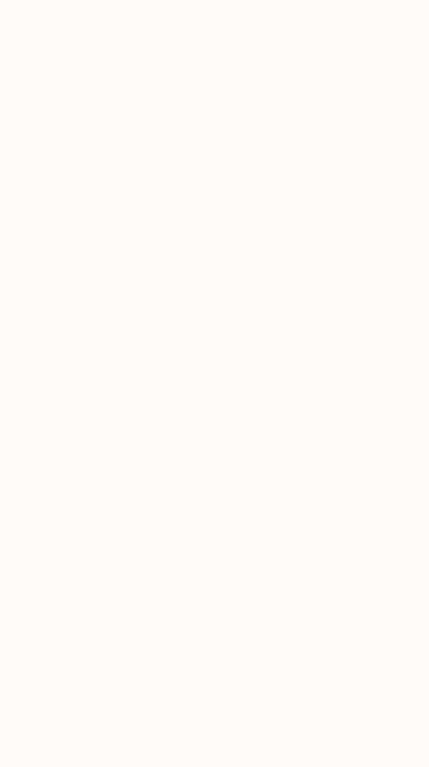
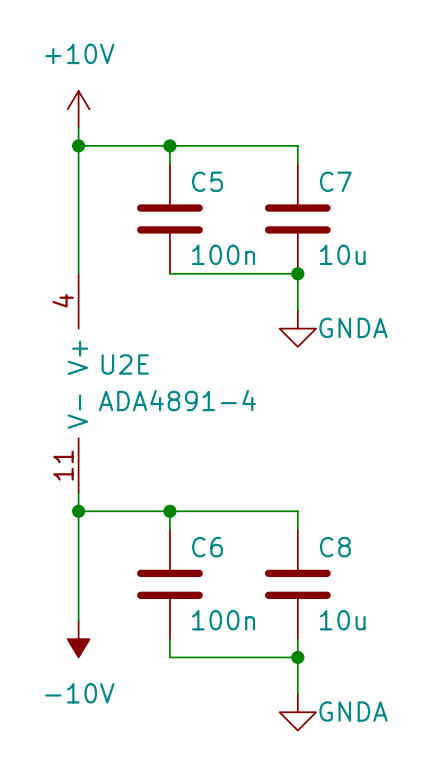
power symbol: none -> +10V (78, 109)
wire: none -> (78, 127) (78, 273)
wire: none -> (78, 145) (297, 145) (297, 164)
junction: none -> (78, 145)
wire: none -> (169, 145) (169, 164)
junction: none -> (169, 145)
C5: none -> 100n (169, 218)
C7: none -> 10u (297, 218)
wire: none -> (169, 273) (297, 273) (297, 310)
junction: none -> (297, 273)
power symbol: none -> GNDA (297, 328)
U2E: none -> ADA4891-4 (78, 383)
wire: none -> (78, 493) (78, 620)
wire: none -> (78, 511) (297, 511) (297, 529)
junction: none -> (78, 511)
wire: none -> (169, 511) (169, 529)
junction: none -> (169, 511)
C6: none -> 100n (169, 584)
C8: none -> 10u (297, 584)
power symbol: none -> -10V (78, 639)
wire: none -> (169, 639) (169, 657) (297, 657)
wire: none -> (297, 639) (297, 693)
junction: none -> (297, 657)
power symbol: none -> GNDA (297, 712)

